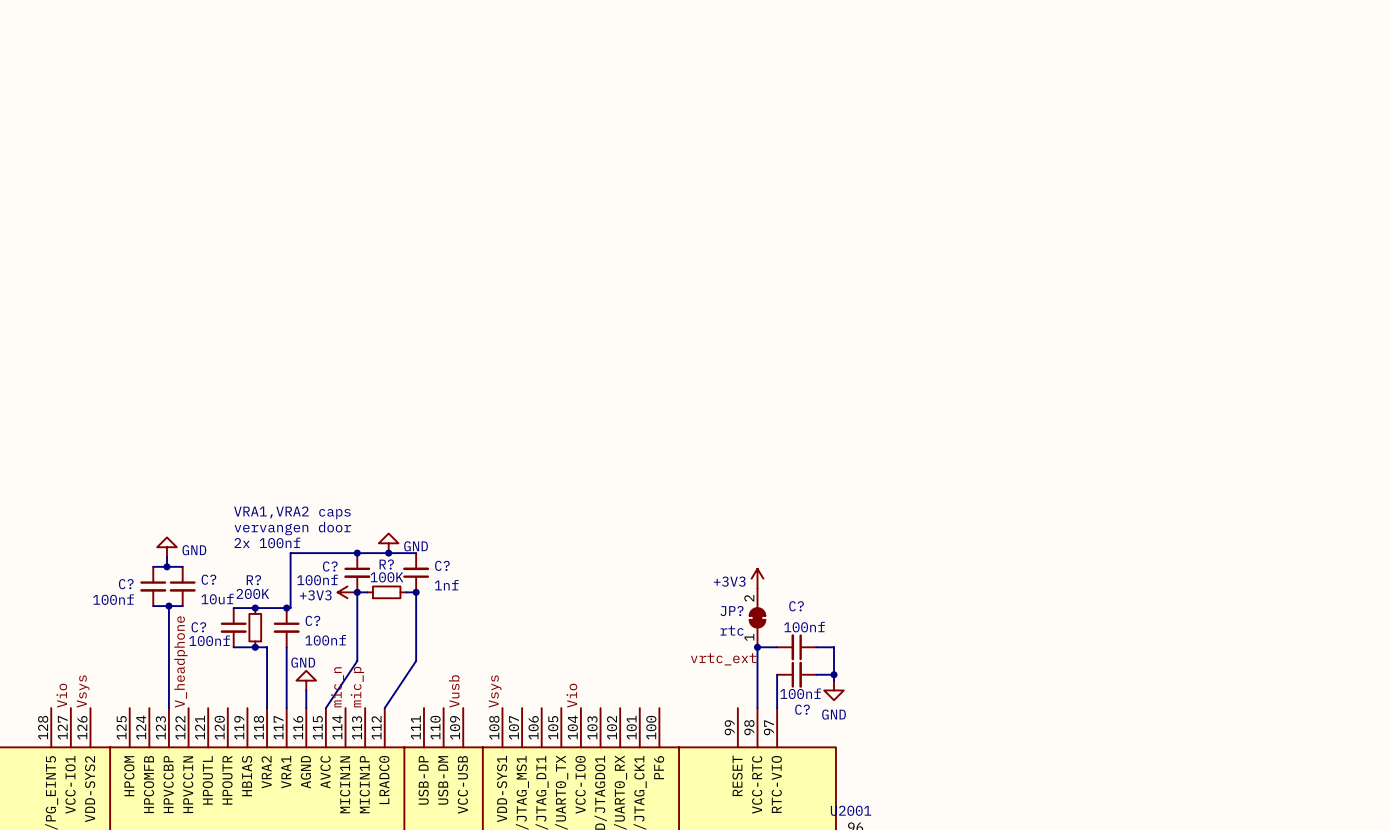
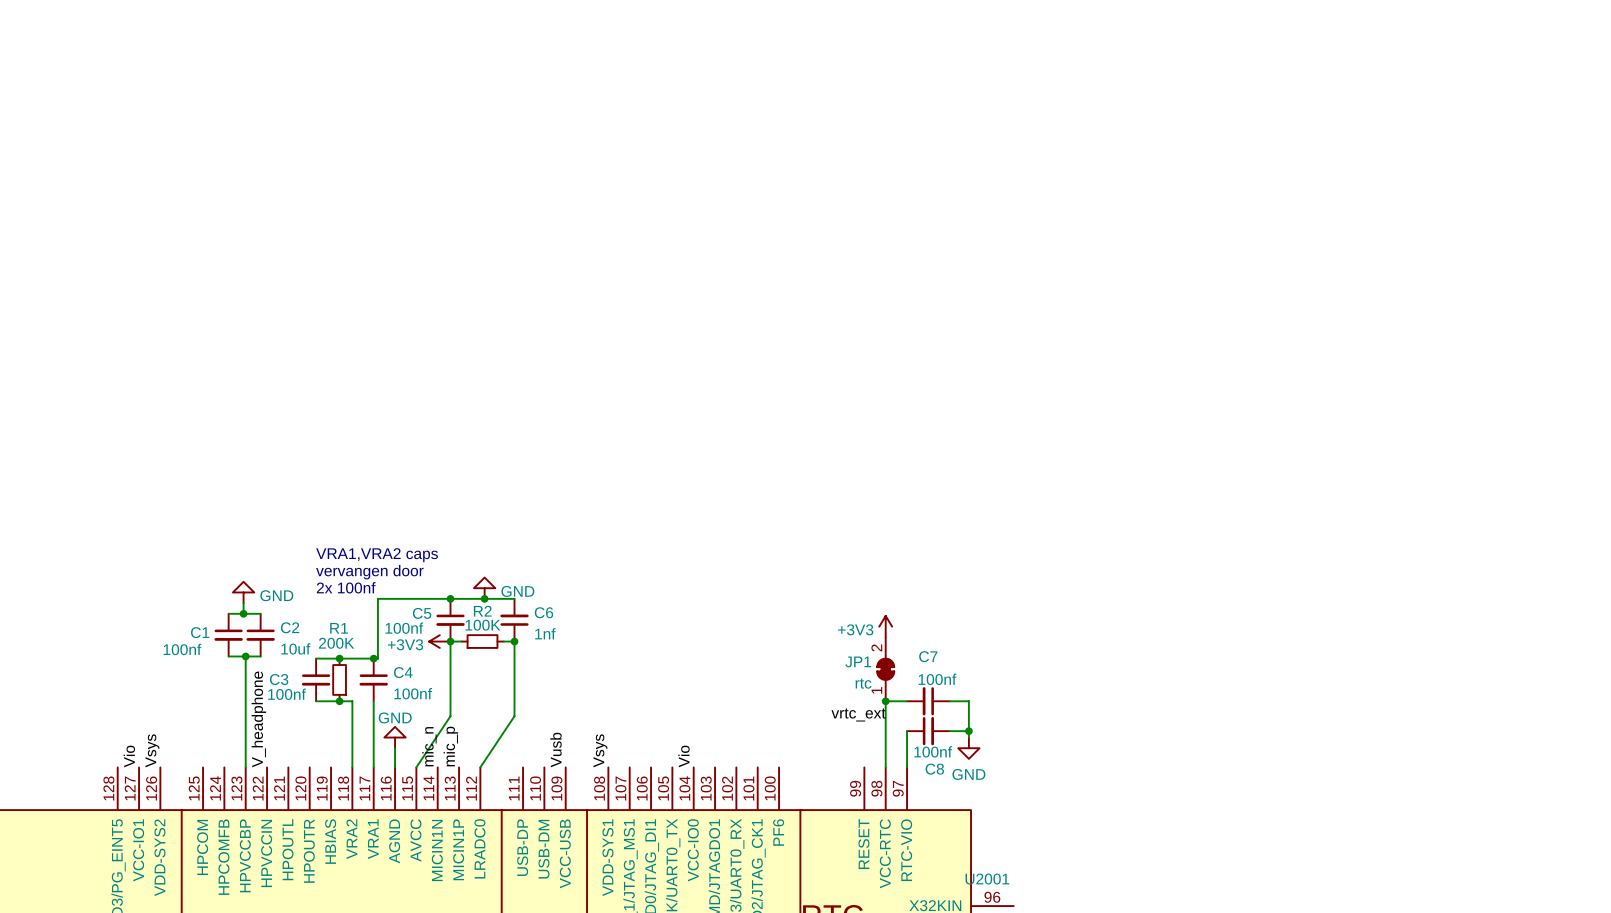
R? name: R? (386, 564) -> R2 (482, 611)
C? name: C? (442, 565) -> C6 (543, 612)
C? name: C? (330, 566) -> C5 (422, 613)
C? name: C? (208, 579) -> C2 (290, 627)
R? name: R? (253, 580) -> R1 (339, 628)
C? name: C? (126, 584) -> C1 (200, 632)
C? name: C? (796, 606) -> C7 (928, 656)
JP? name: JP? (731, 611) -> JP1 (858, 661)
C? name: C? (312, 620) -> C4 (403, 672)
C? name: C? (198, 627) -> C3 (279, 679)
C? name: C? (802, 709) -> C8 (934, 769)

